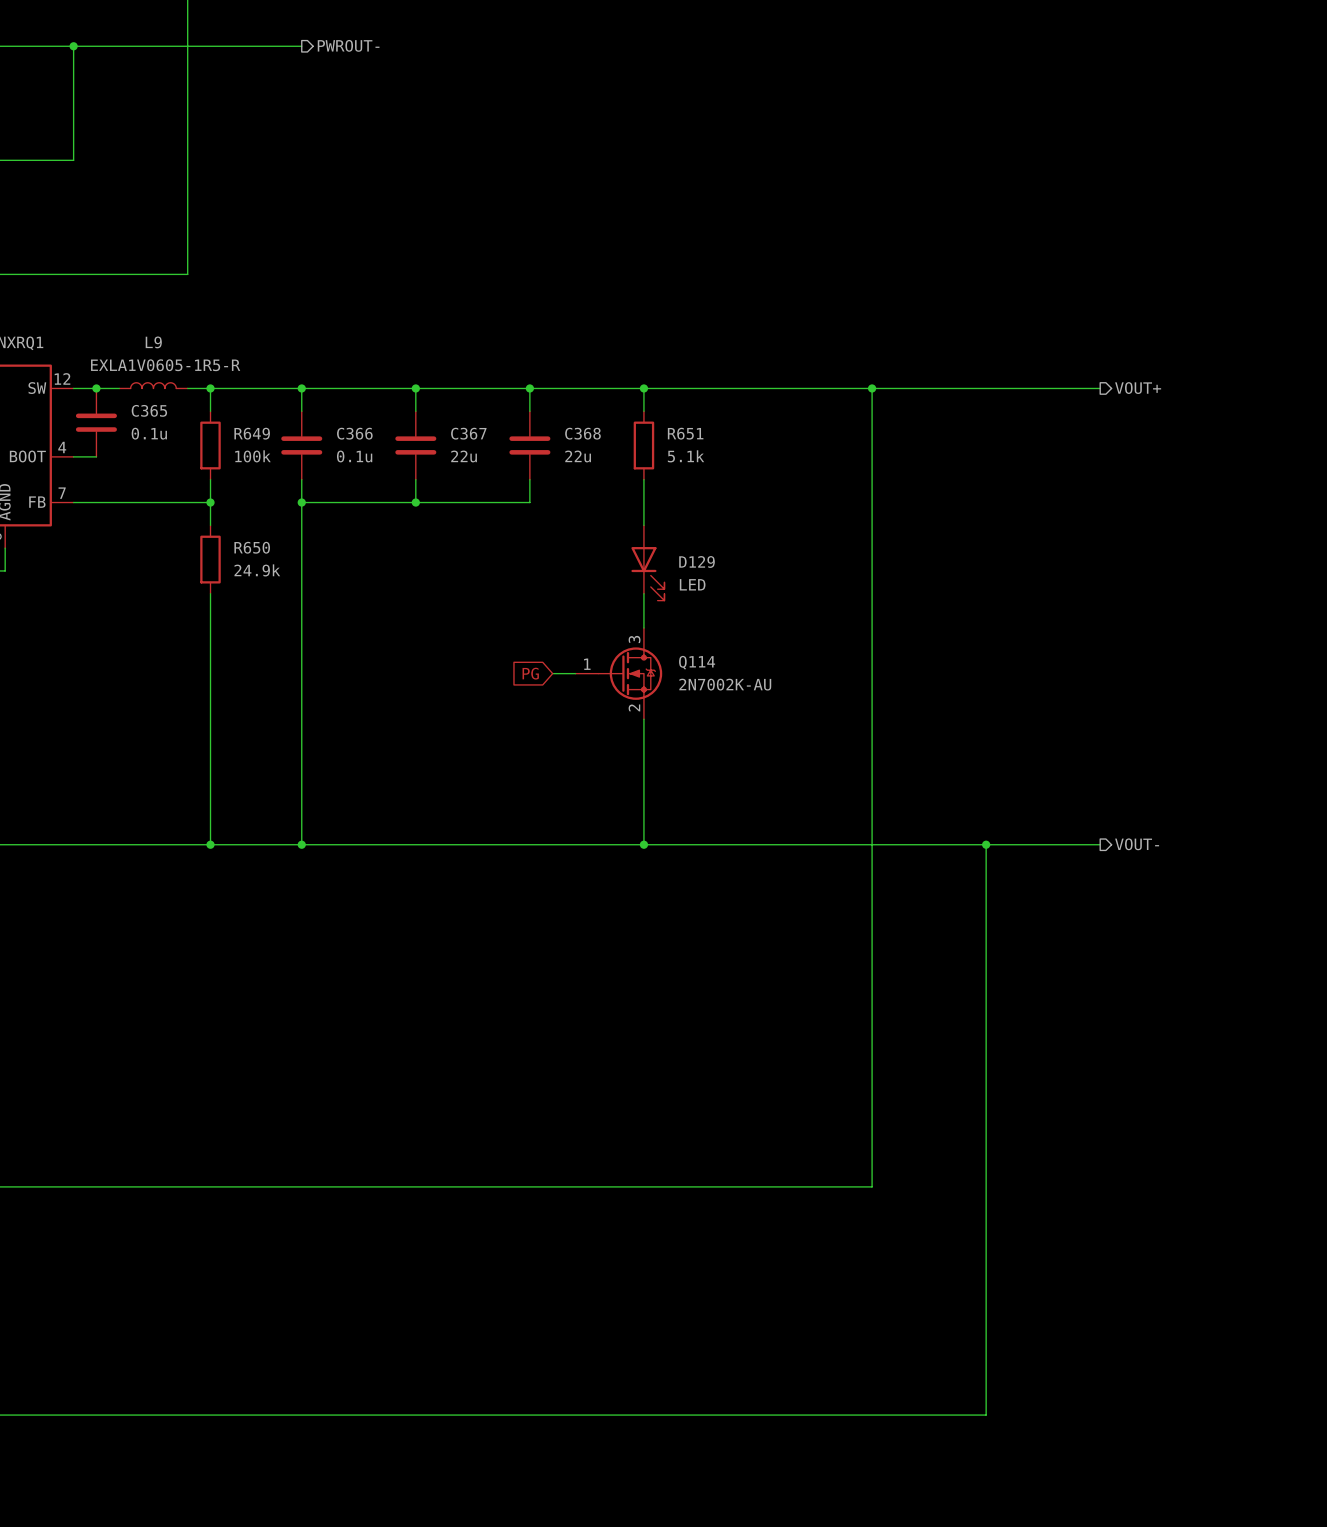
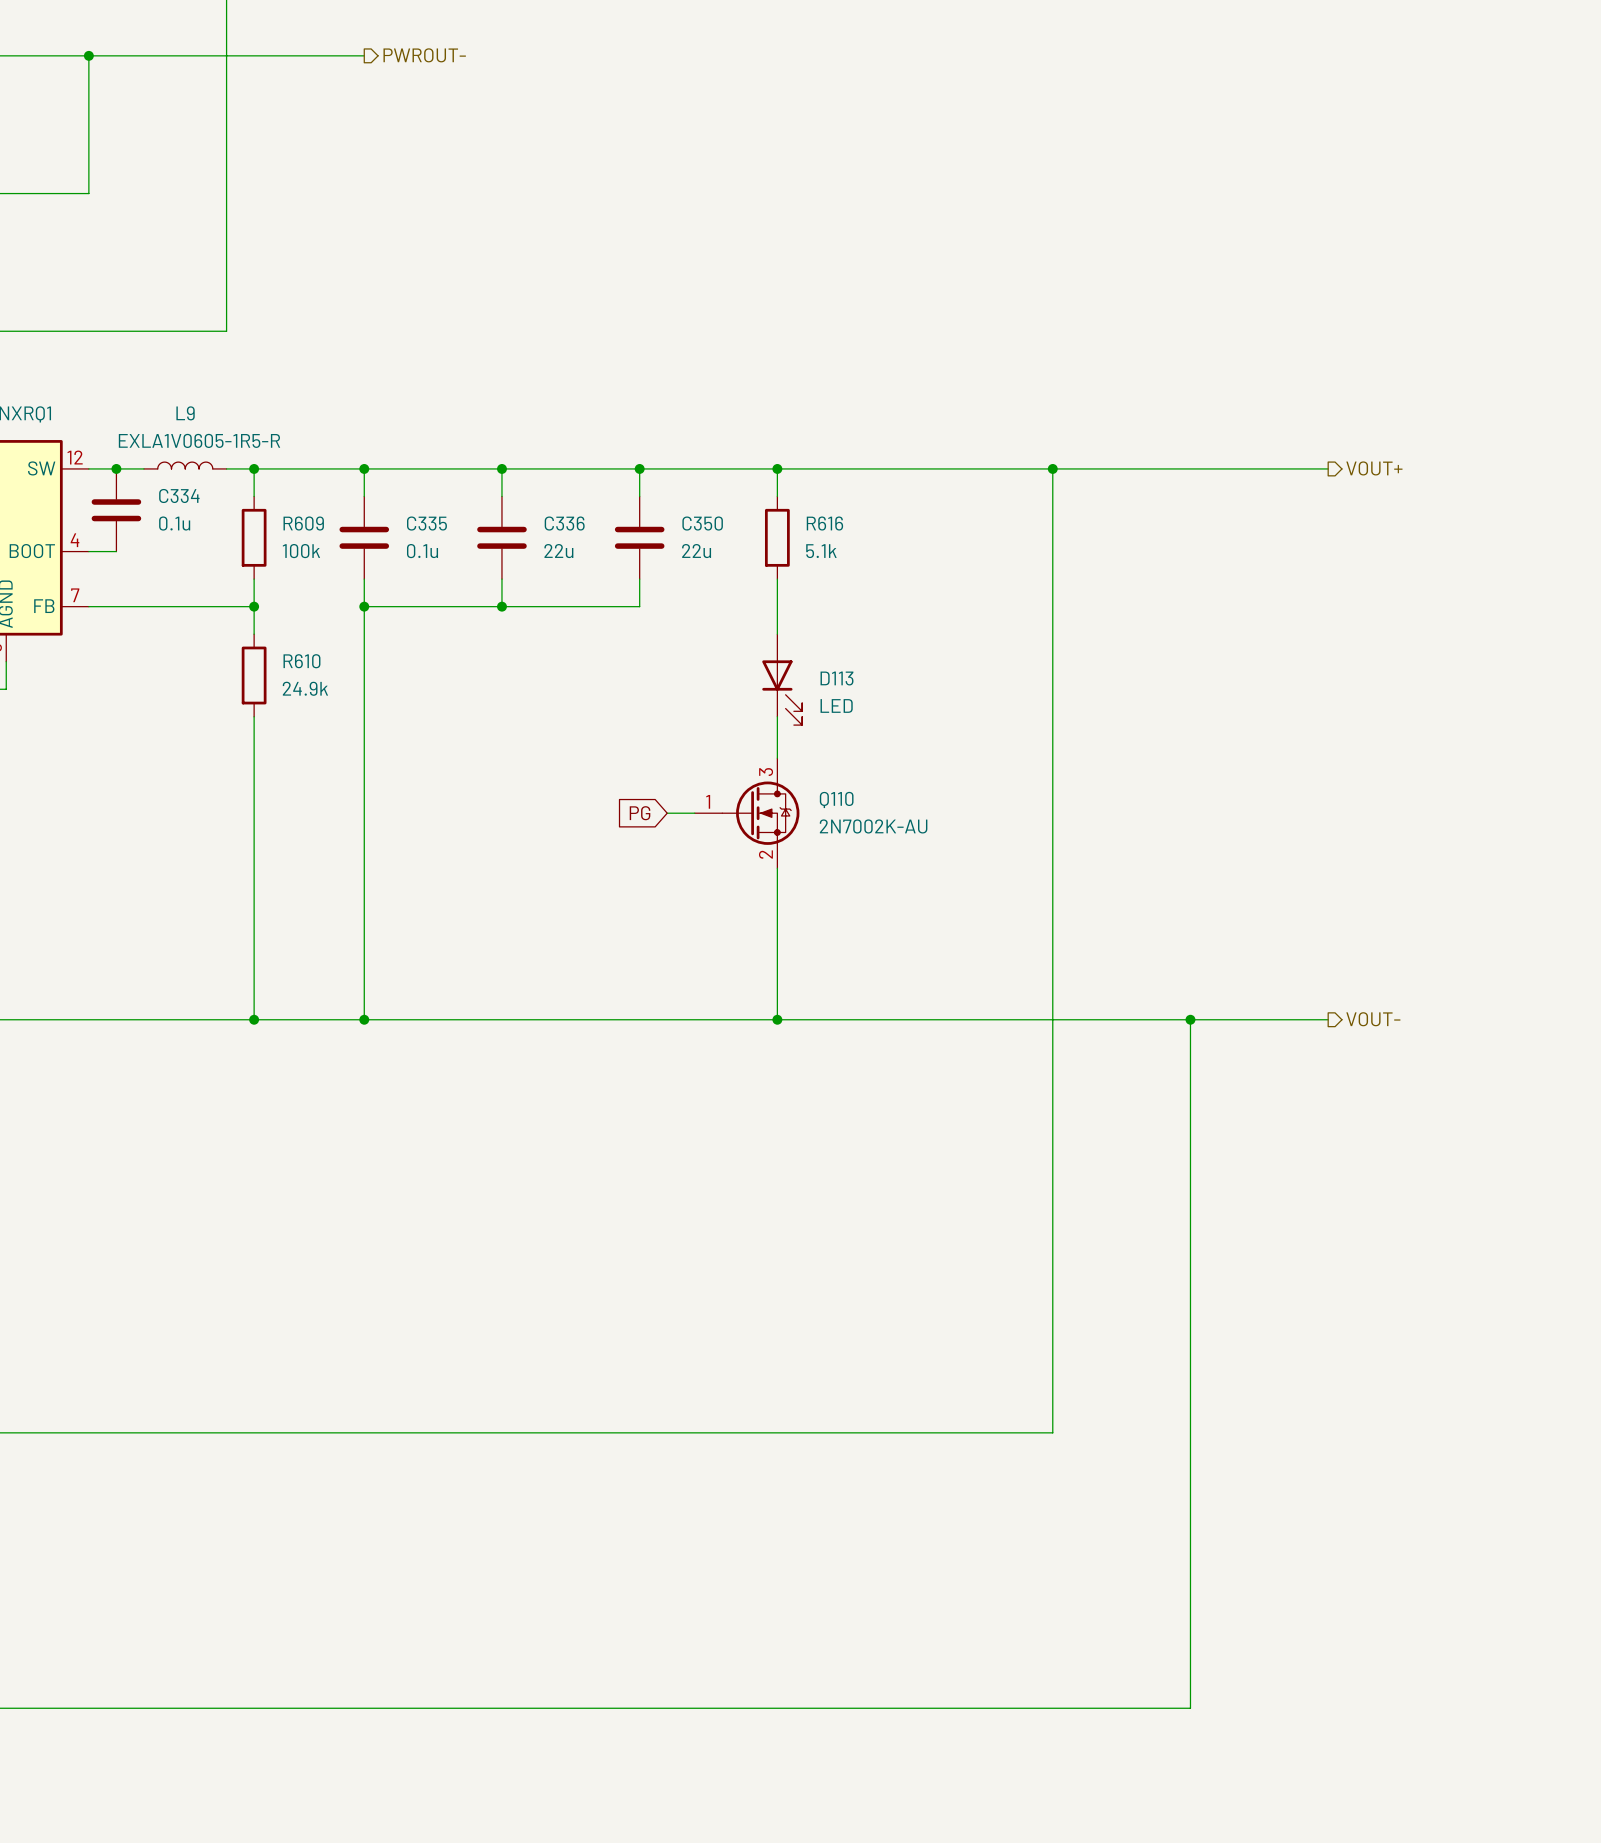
C365 name: C365 (149, 410) -> C334 (179, 495)
R649 name: R649 (252, 433) -> R609 (303, 523)
C366 name: C366 (354, 433) -> C335 (426, 523)
C367 name: C367 (468, 433) -> C336 (564, 523)
C368 name: C368 (582, 433) -> C350 (702, 523)
R651 name: R651 (685, 433) -> R616 (824, 523)
R650 name: R650 (252, 547) -> R610 (301, 661)
D129 name: D129 (697, 562) -> D113 (837, 678)
Q114 name: Q114 (697, 662) -> Q110 (836, 799)

